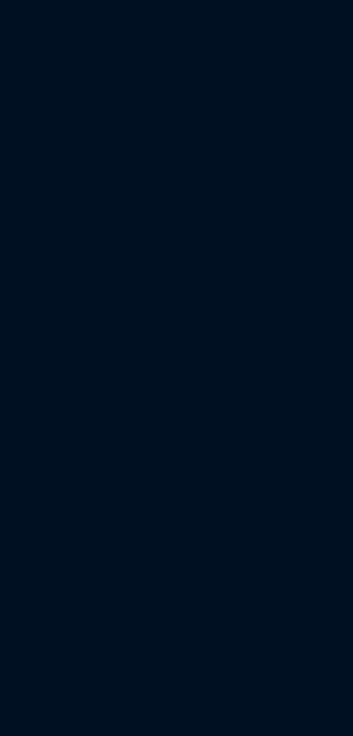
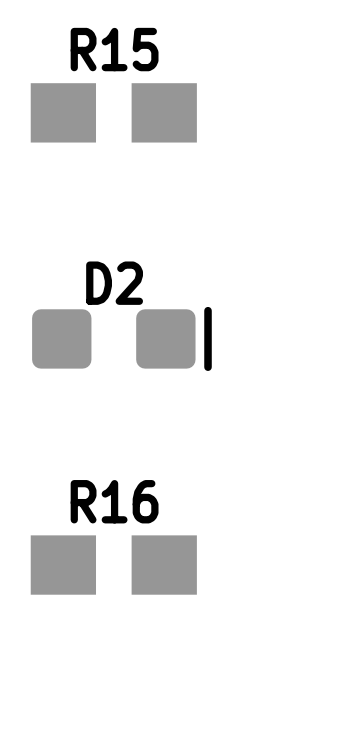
R15: none -> (113, 112)
D2: none -> (121, 338)
R16: none -> (113, 565)

